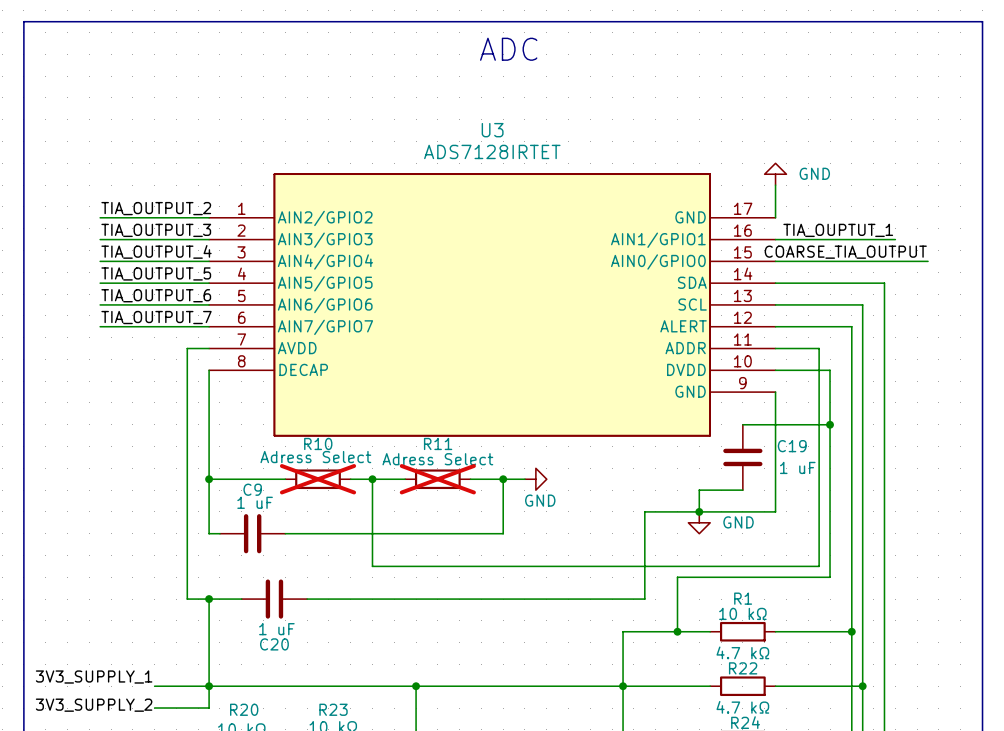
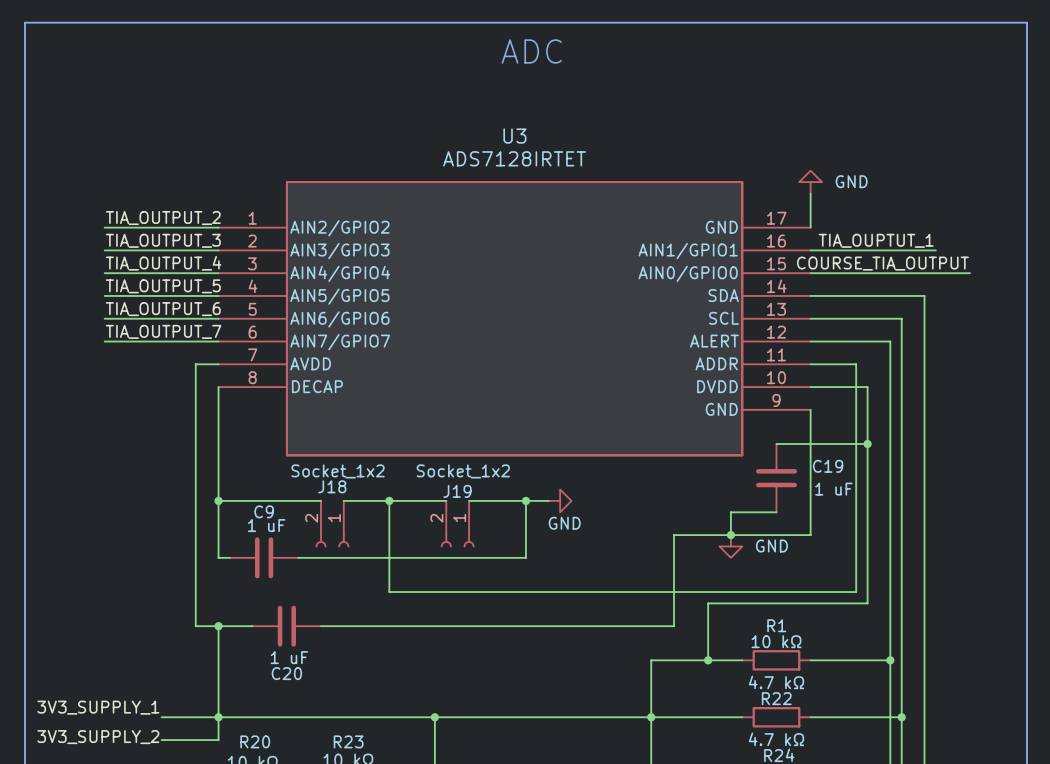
label: COARSE_TIA_OUTPUT (845, 252) -> COURSE_TIA_OUTPUT (882, 263)
R10: Adress Select (318, 479) -> none
R11: Adress Select (437, 479) -> none
J18: none -> Socket_1x2 (332, 524)
J19: none -> Socket_1x2 (457, 524)

